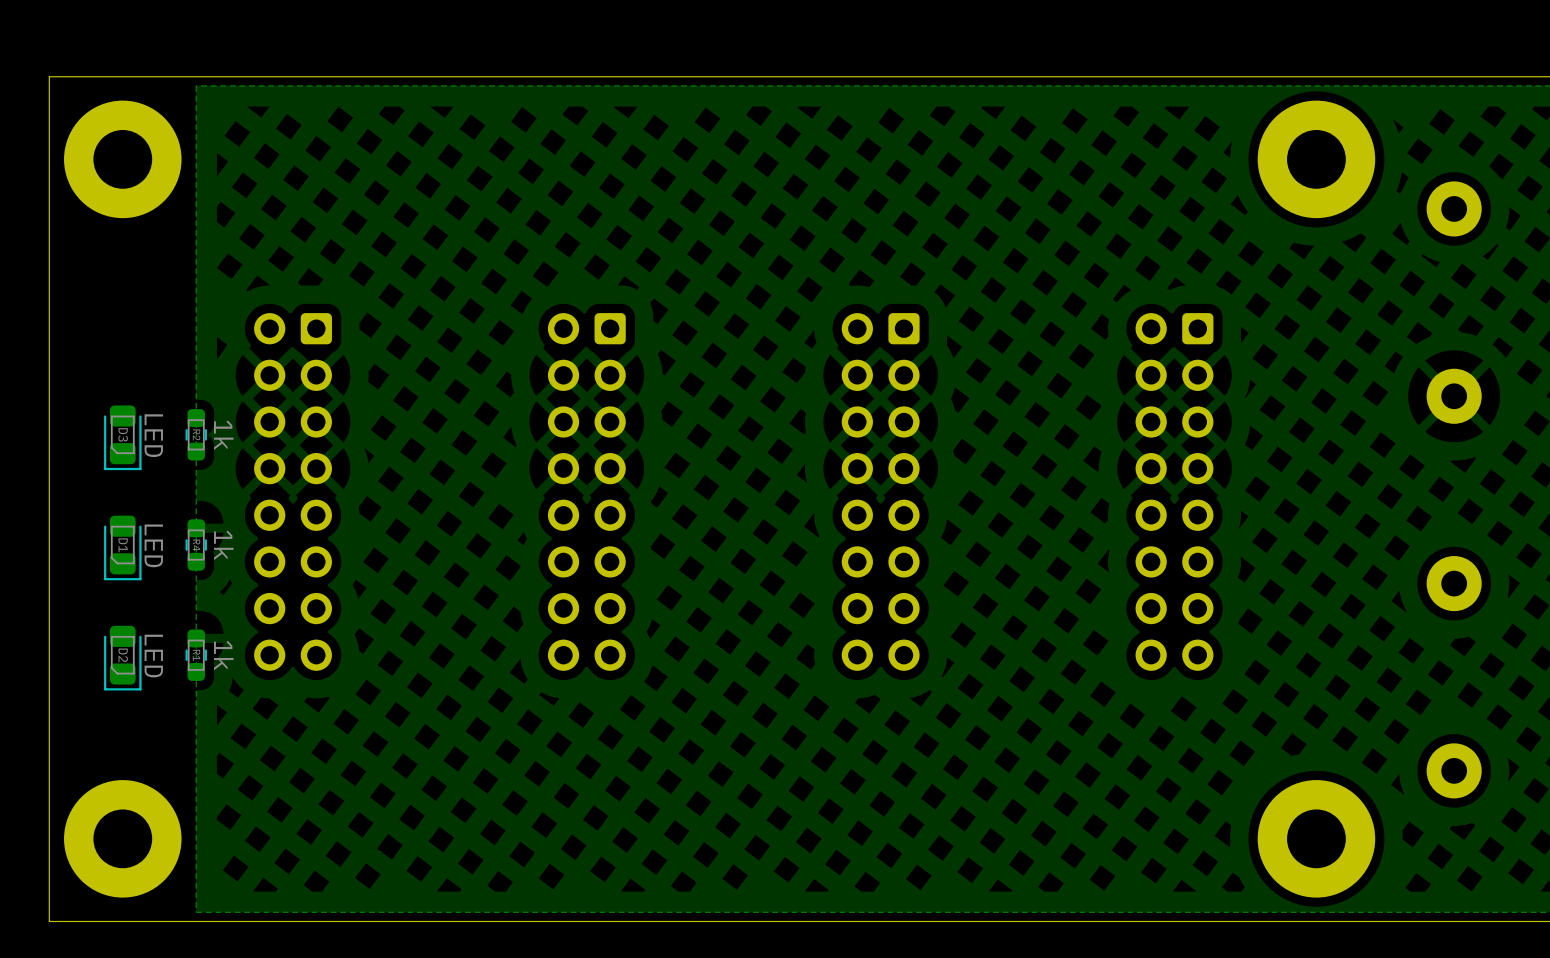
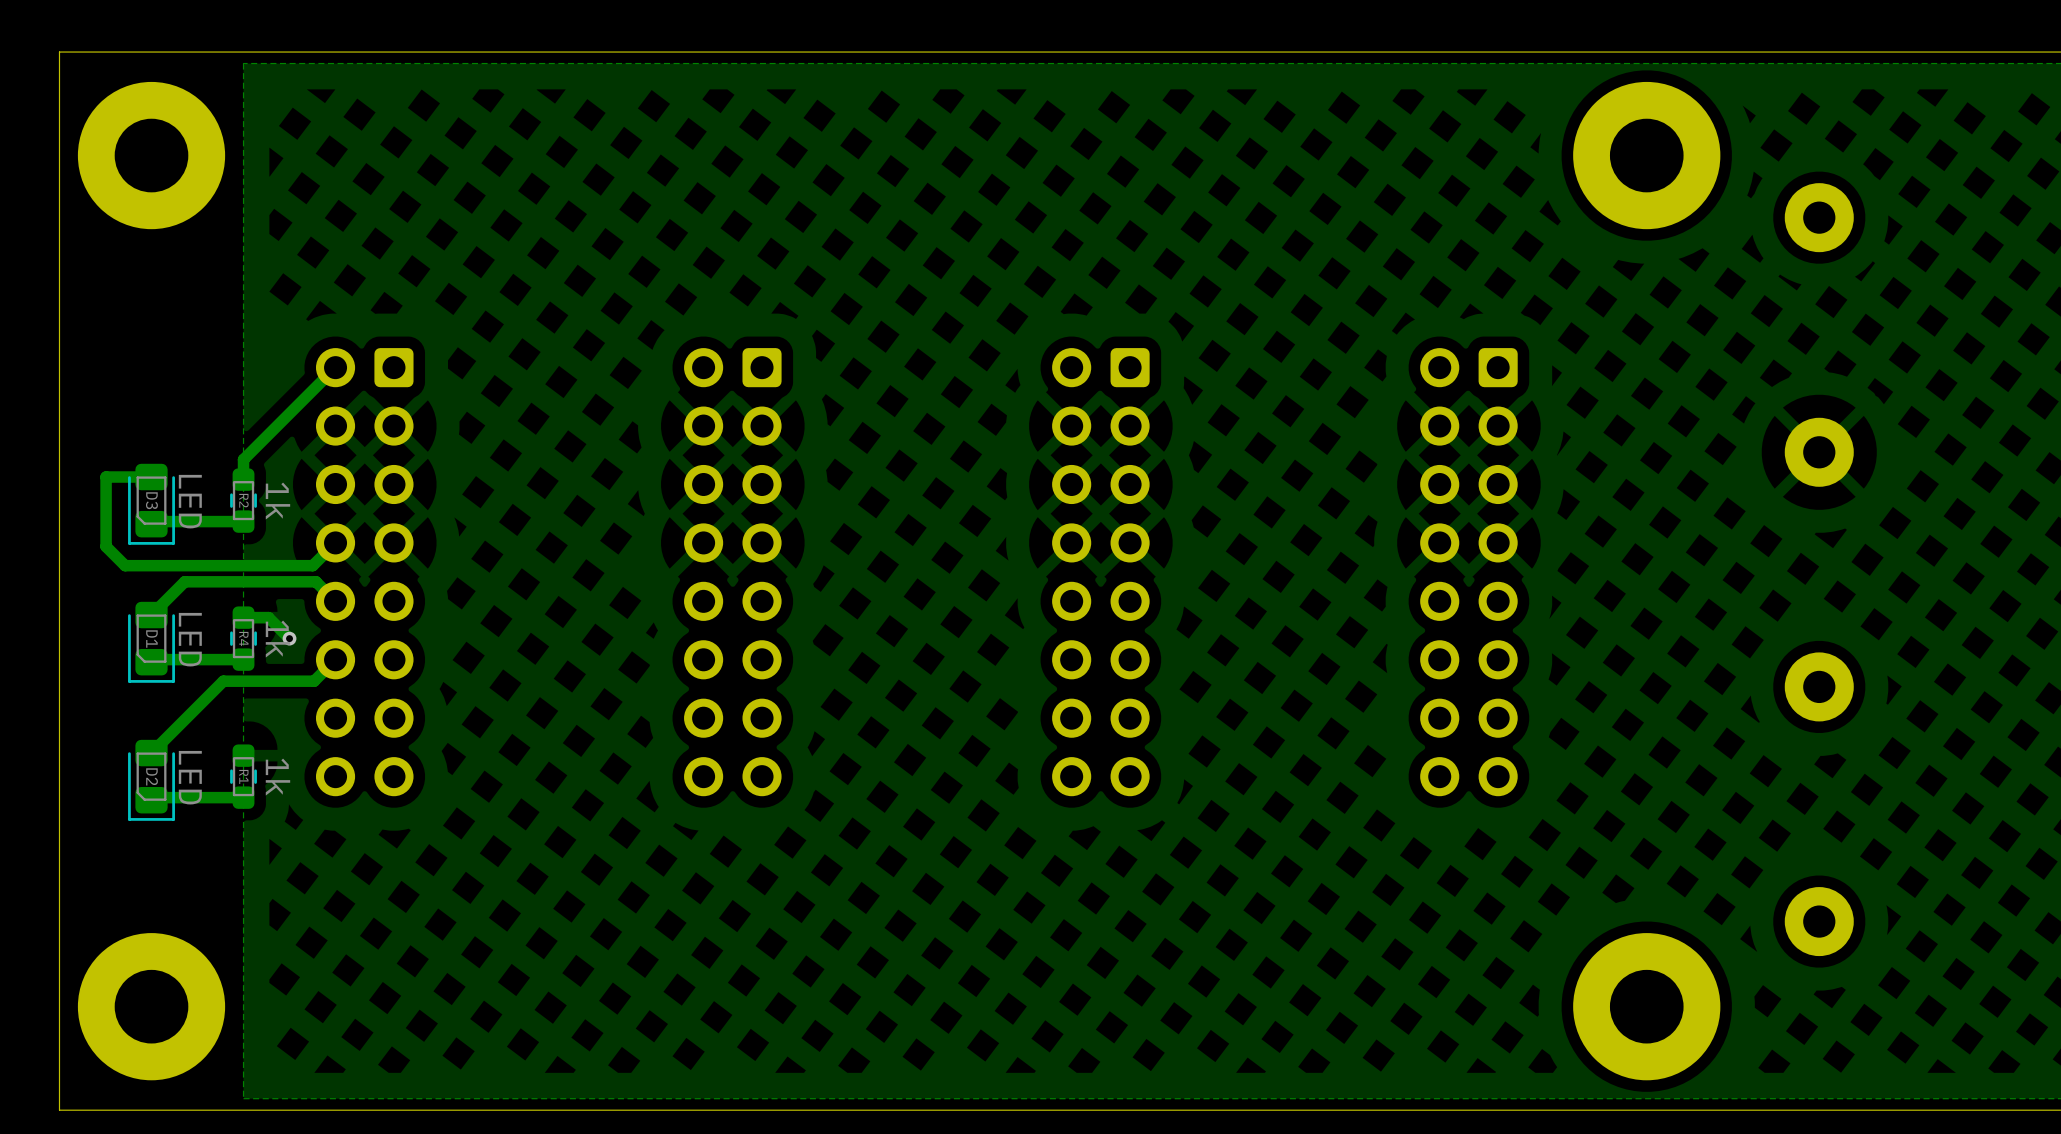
track: none -> (335, 367) (243, 459) (243, 479)
track: none -> (151, 477) (106, 477) (106, 546) (125, 565) (312, 565) (335, 542)
track: none -> (243, 521) (154, 521) (151, 524)
track: none -> (335, 601) (315, 581) (184, 581) (151, 615)
track: none -> (243, 617) (268, 617) (289, 638)
via: none -> (289, 638)
track: none -> (243, 659) (154, 659) (151, 662)
track: none -> (335, 659) (314, 681) (223, 681) (151, 753)
track: none -> (243, 797) (154, 797) (151, 800)

